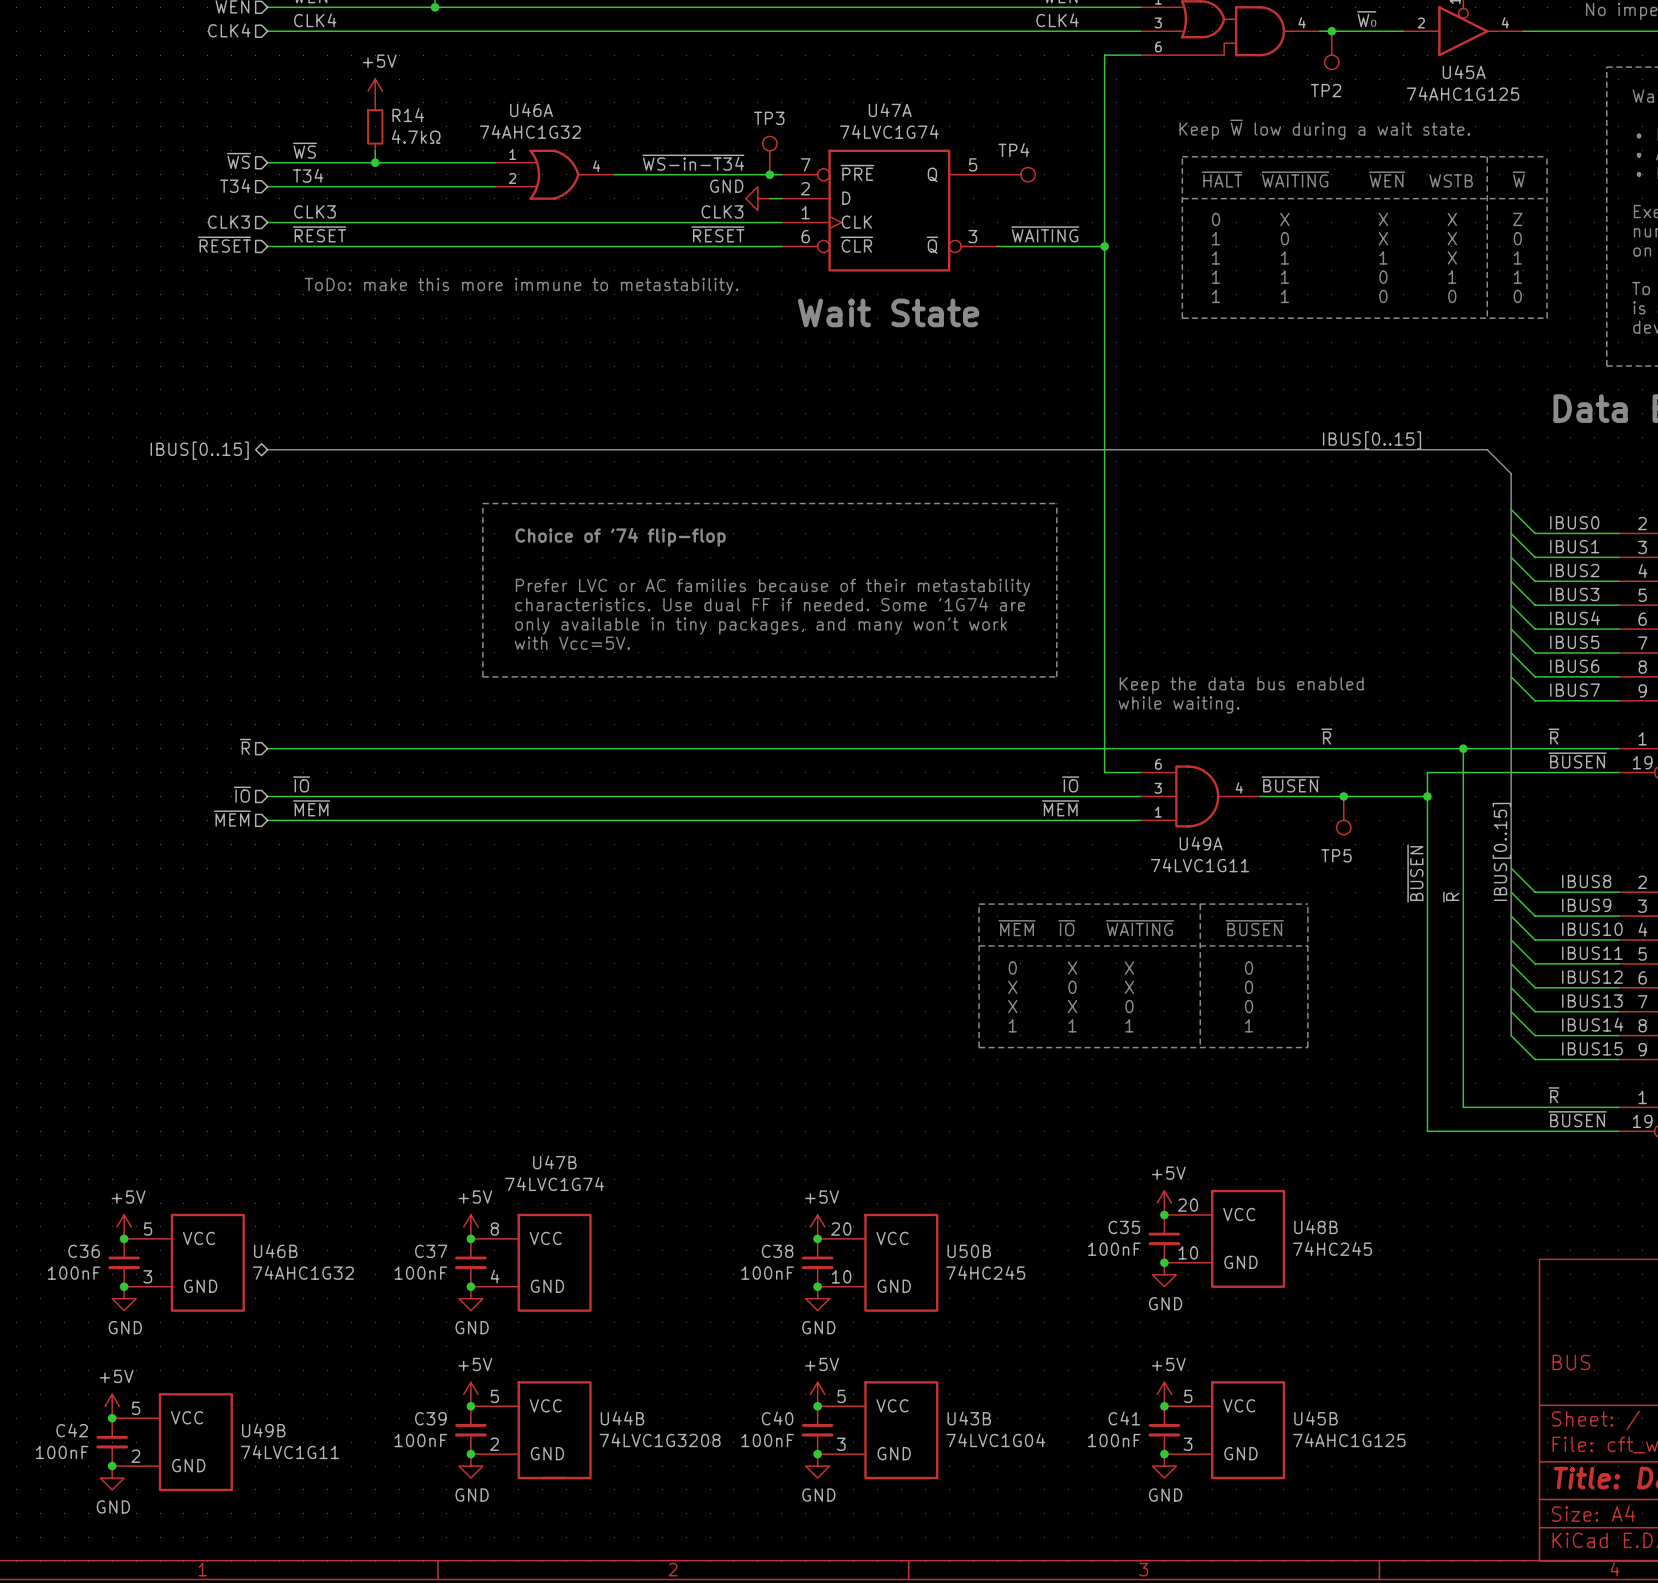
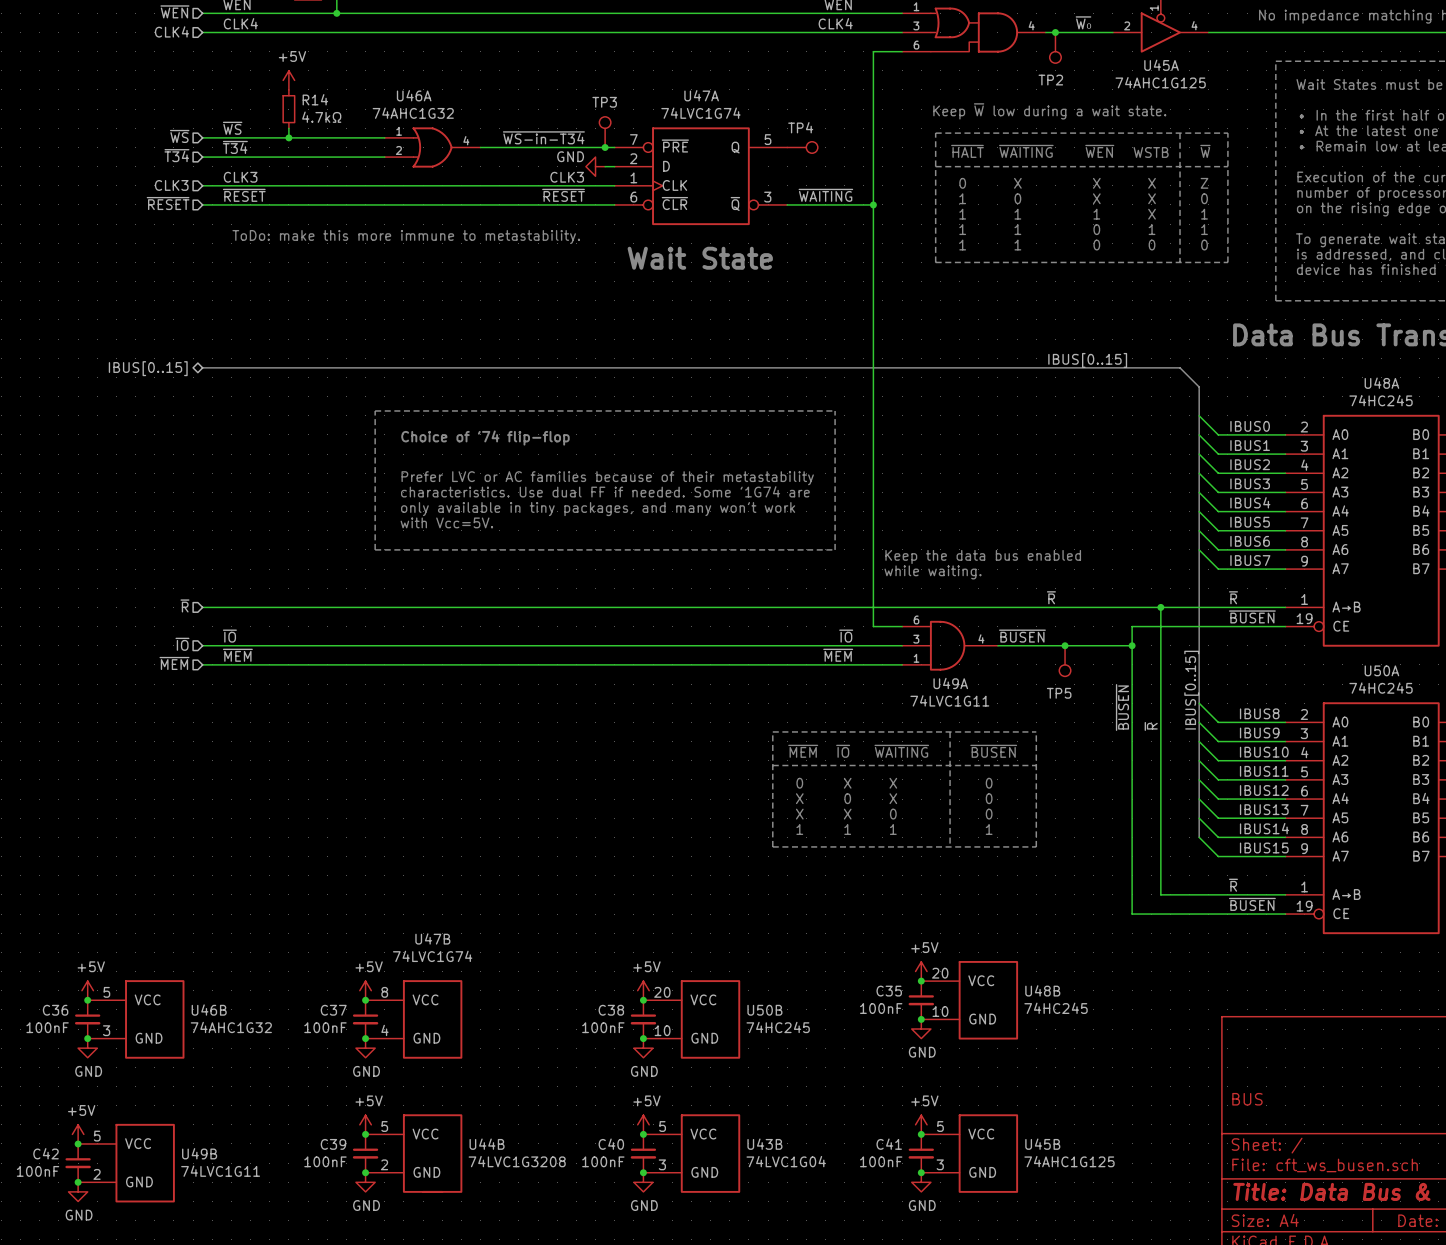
label: T34 (308, 175) -> ~{T34} (235, 147)
hierarchical label: T34 (235, 185) -> ~{T34} (176, 155)

